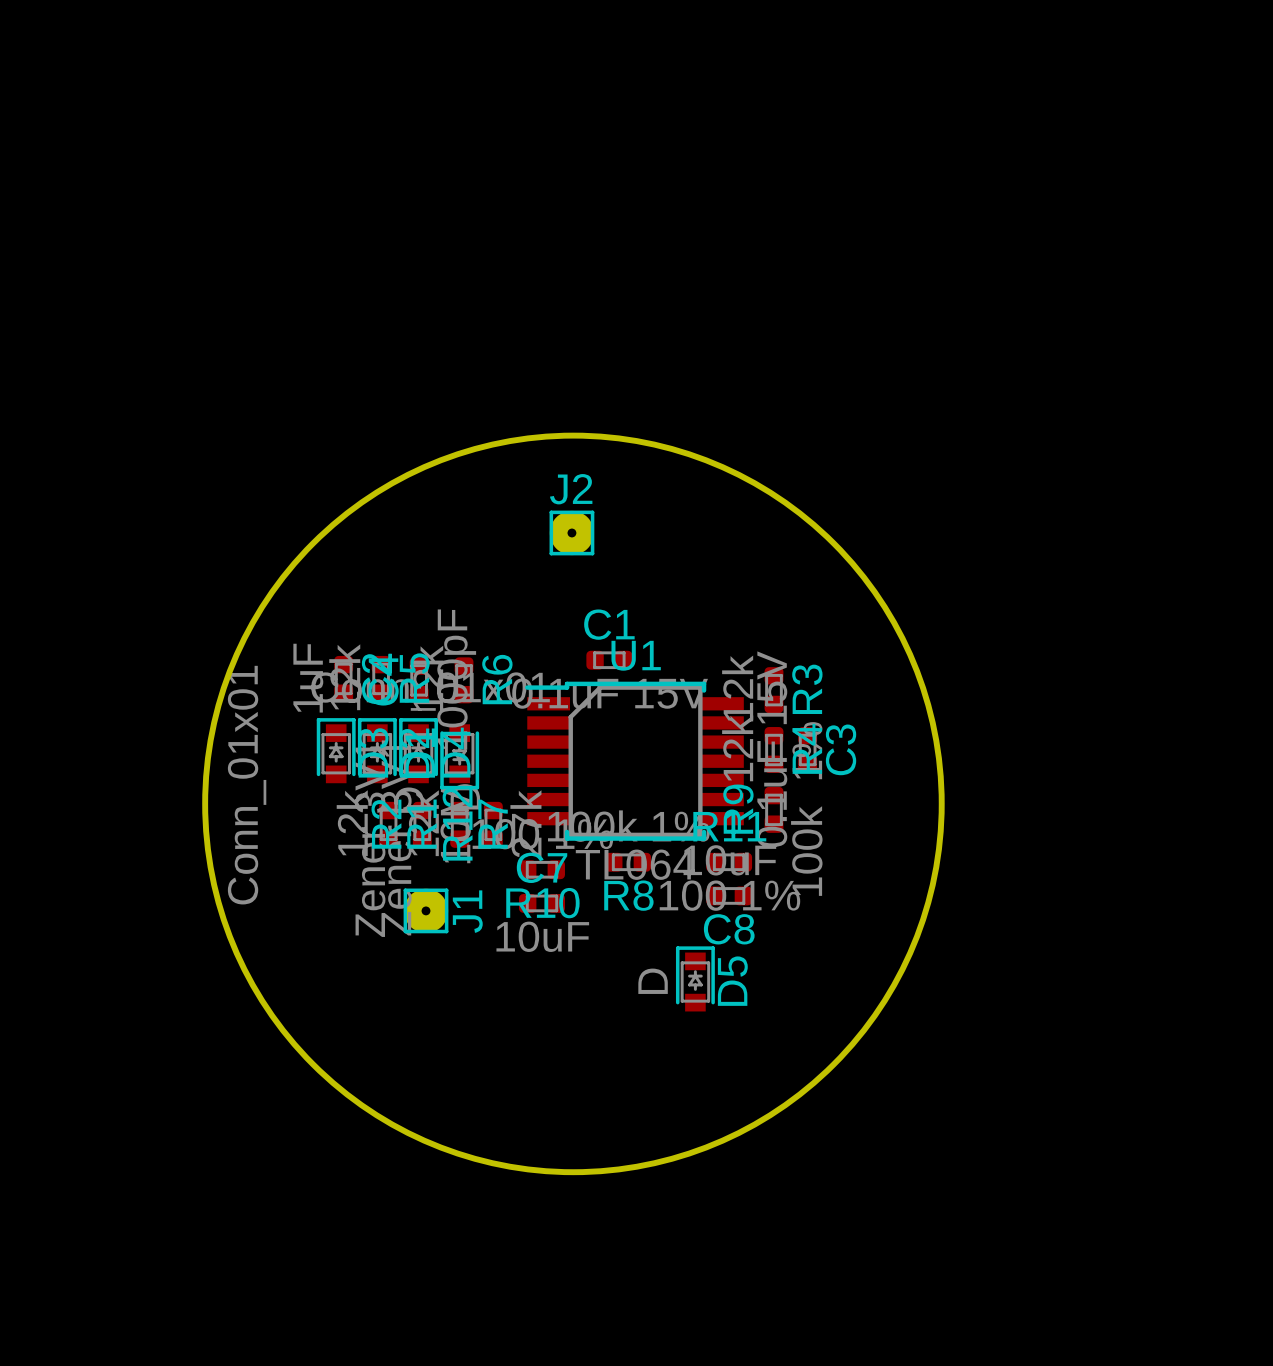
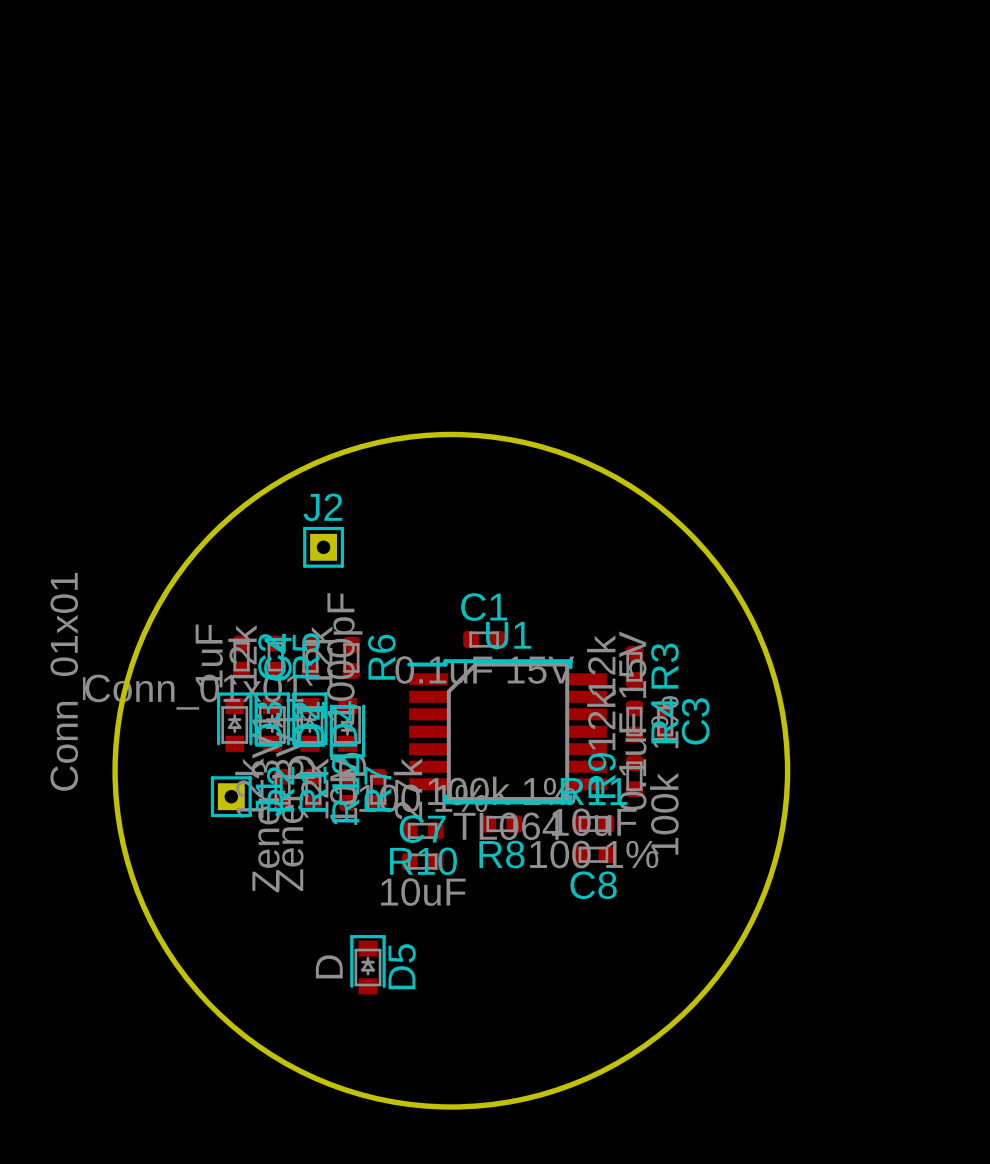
J2 footprint: [549, 510, 595, 556] -> [303, 526, 345, 568]
J1 footprint: [403, 888, 449, 934] -> [210, 776, 252, 818]
D5 position: (695, 978) -> (367, 964)

